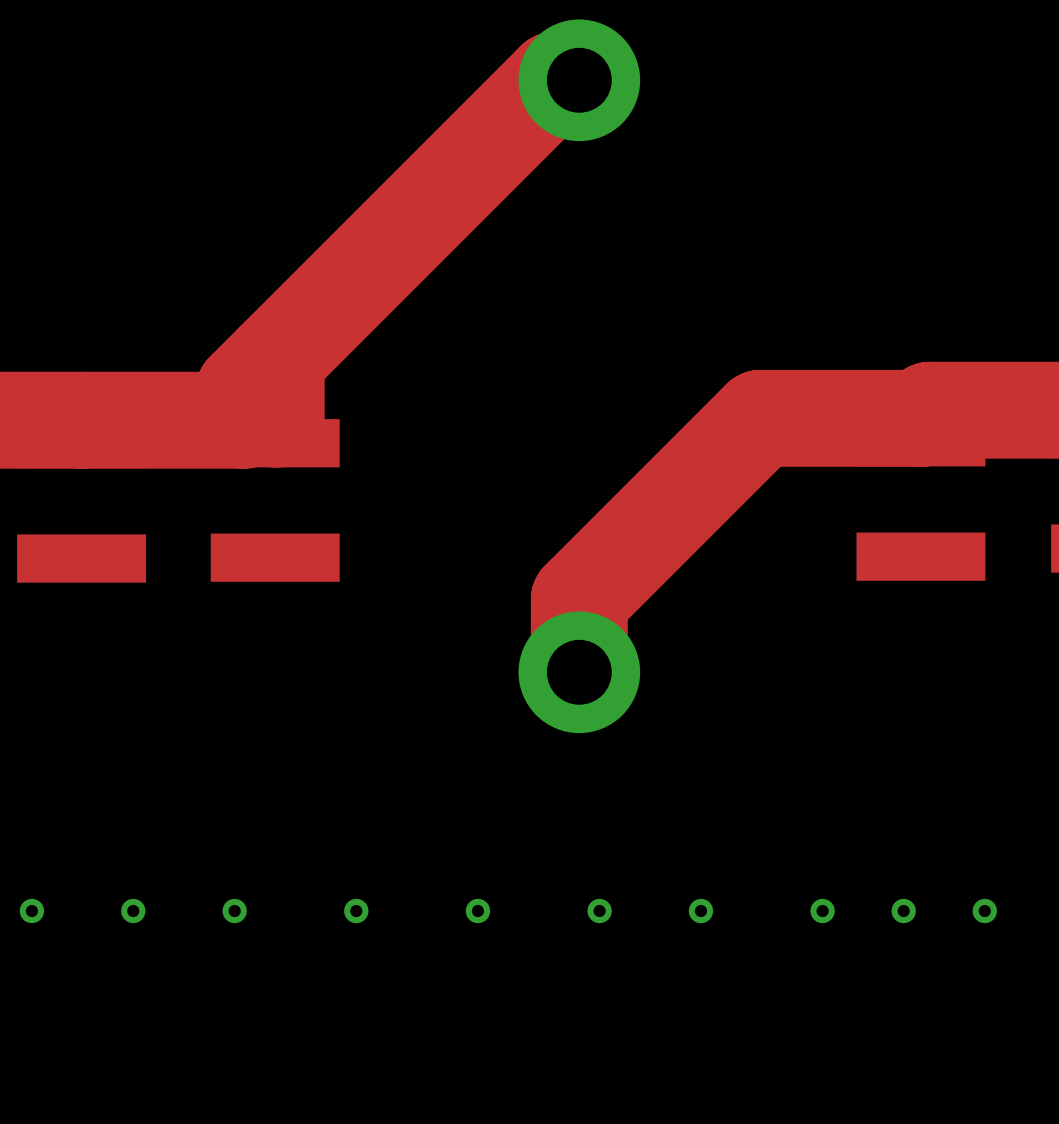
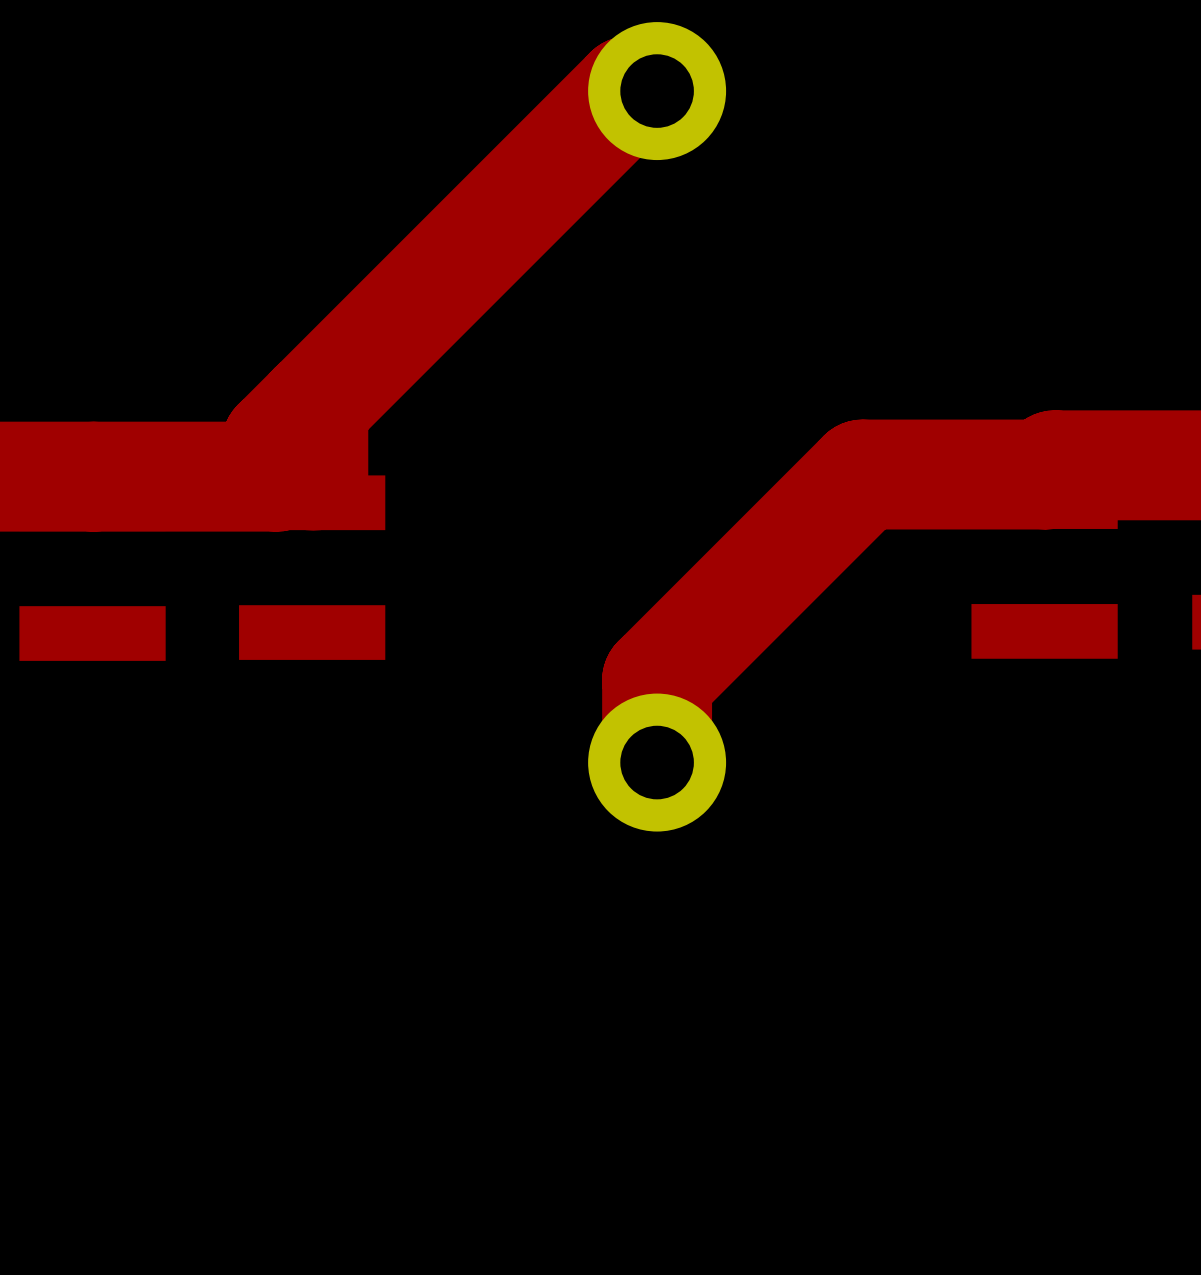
via: (31, 911) -> none
via: (133, 911) -> none
via: (234, 911) -> none
via: (356, 911) -> none
via: (477, 911) -> none
via: (599, 911) -> none
via: (700, 911) -> none
via: (822, 911) -> none
via: (903, 911) -> none
via: (984, 911) -> none

